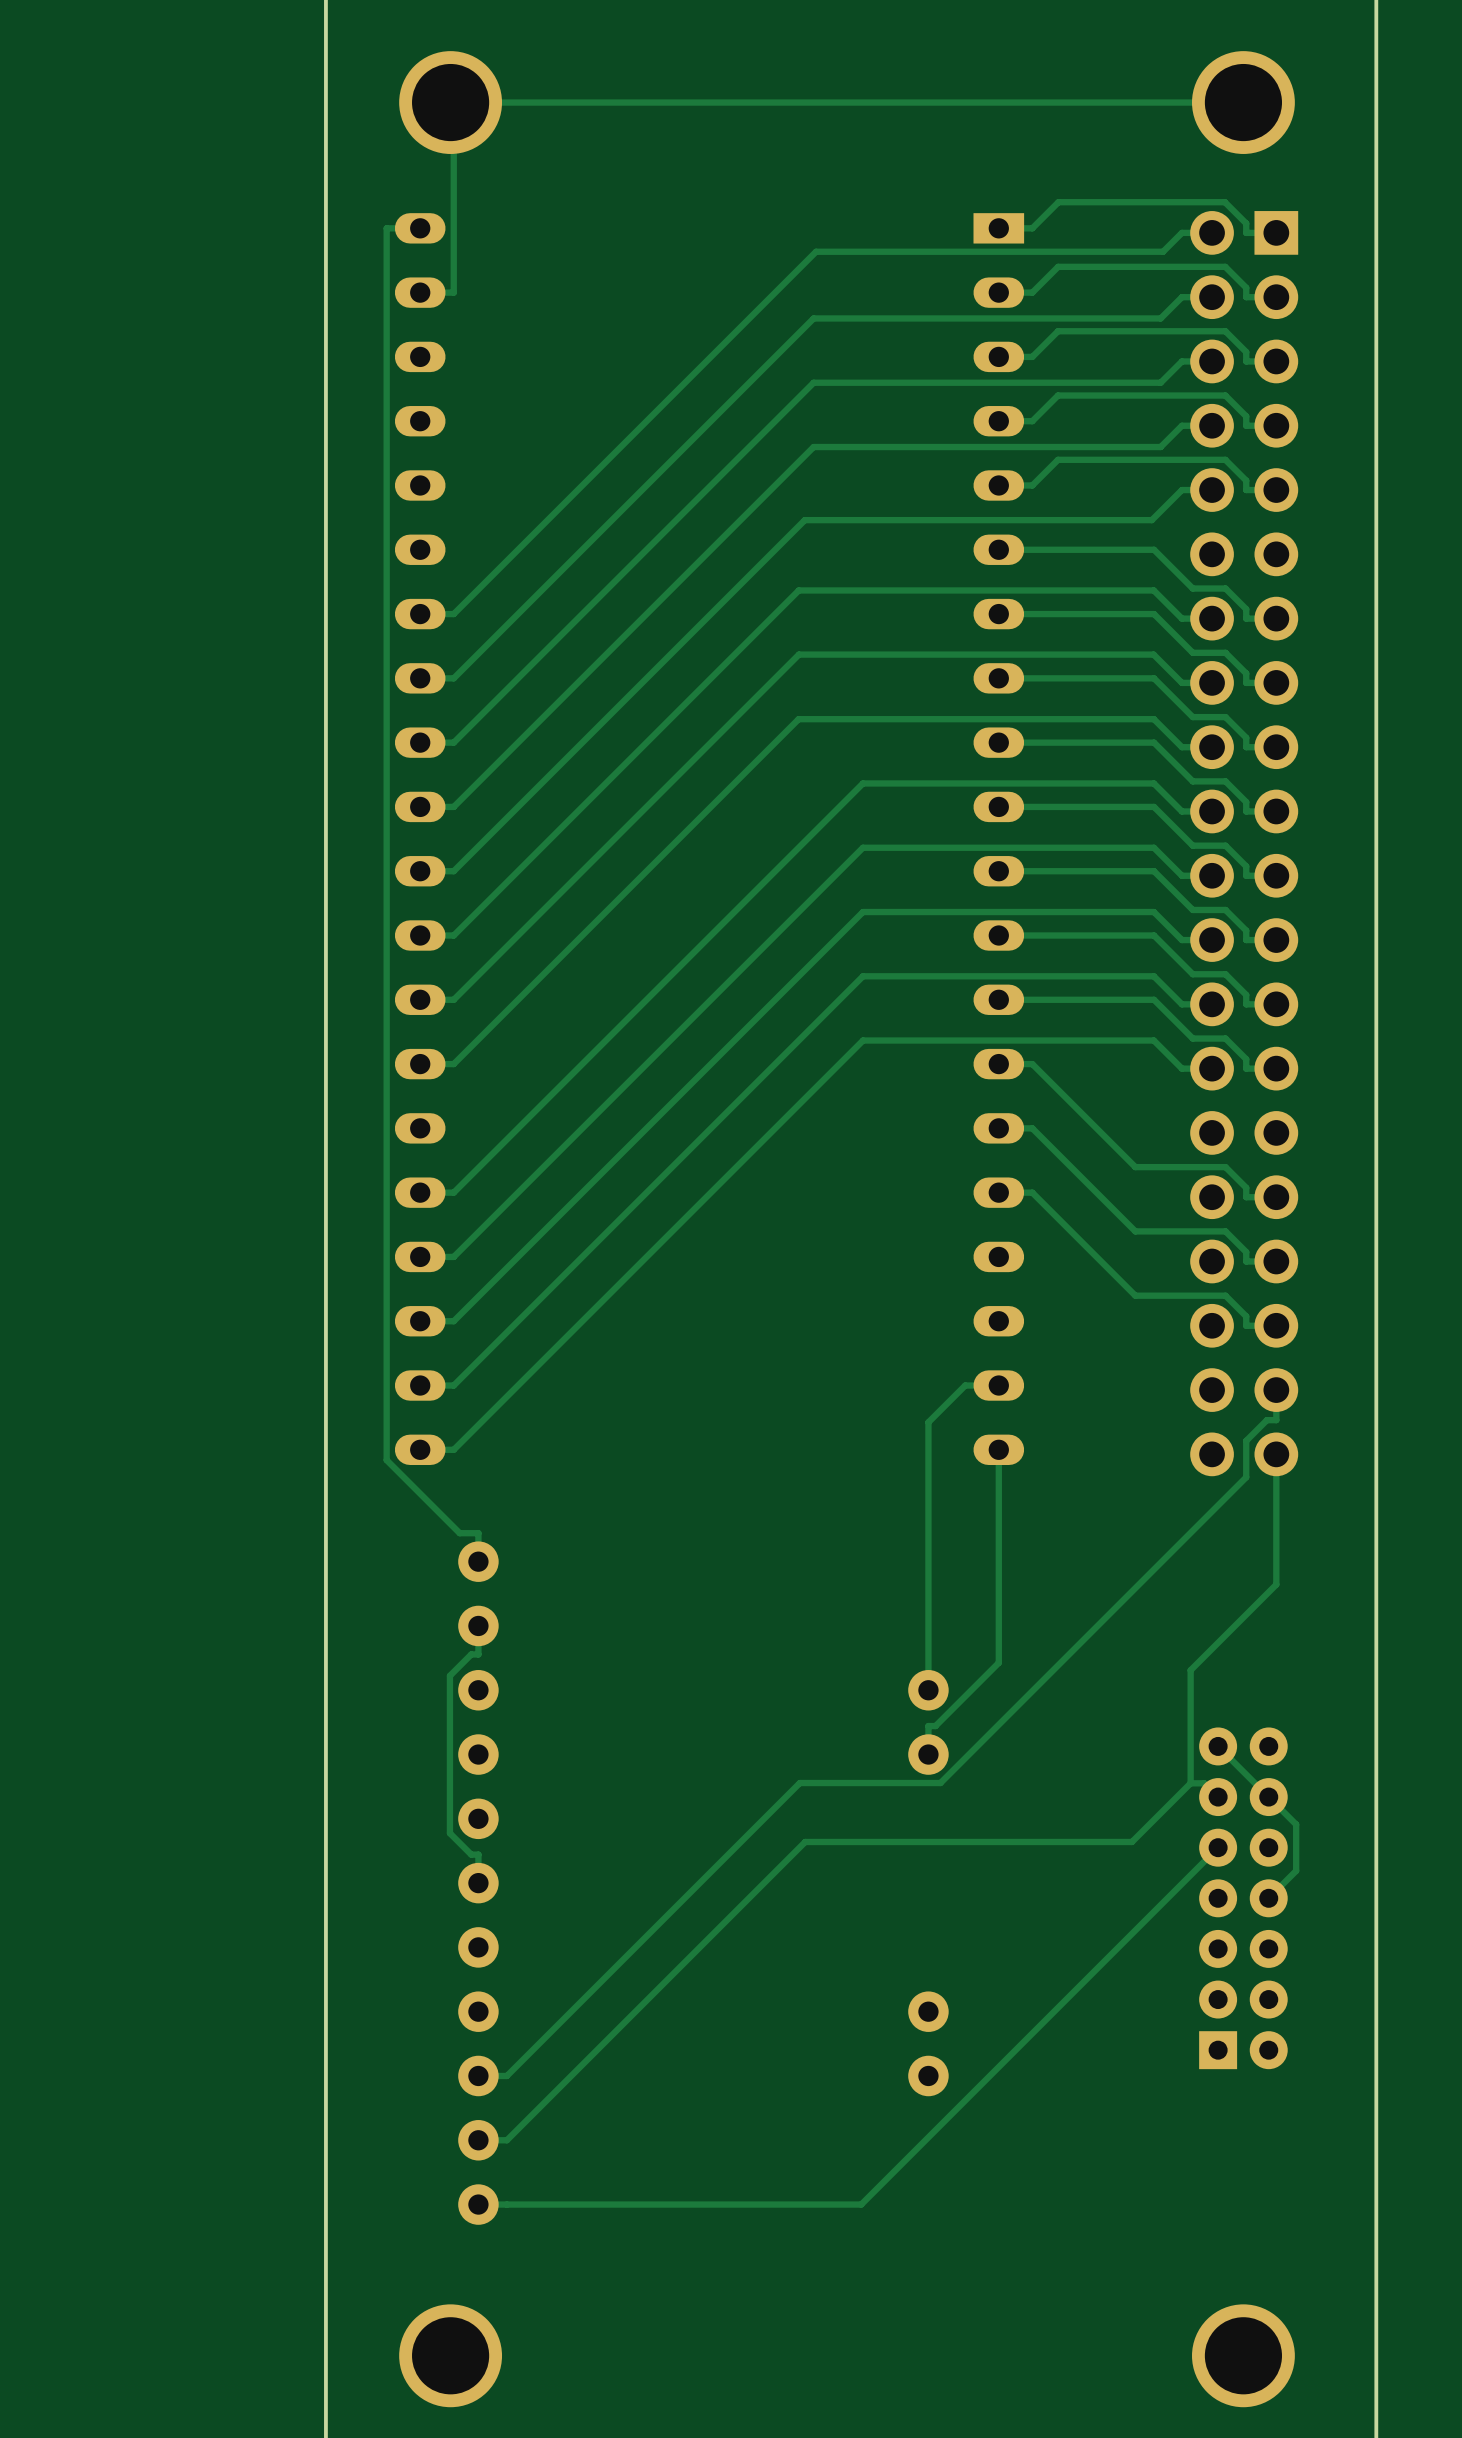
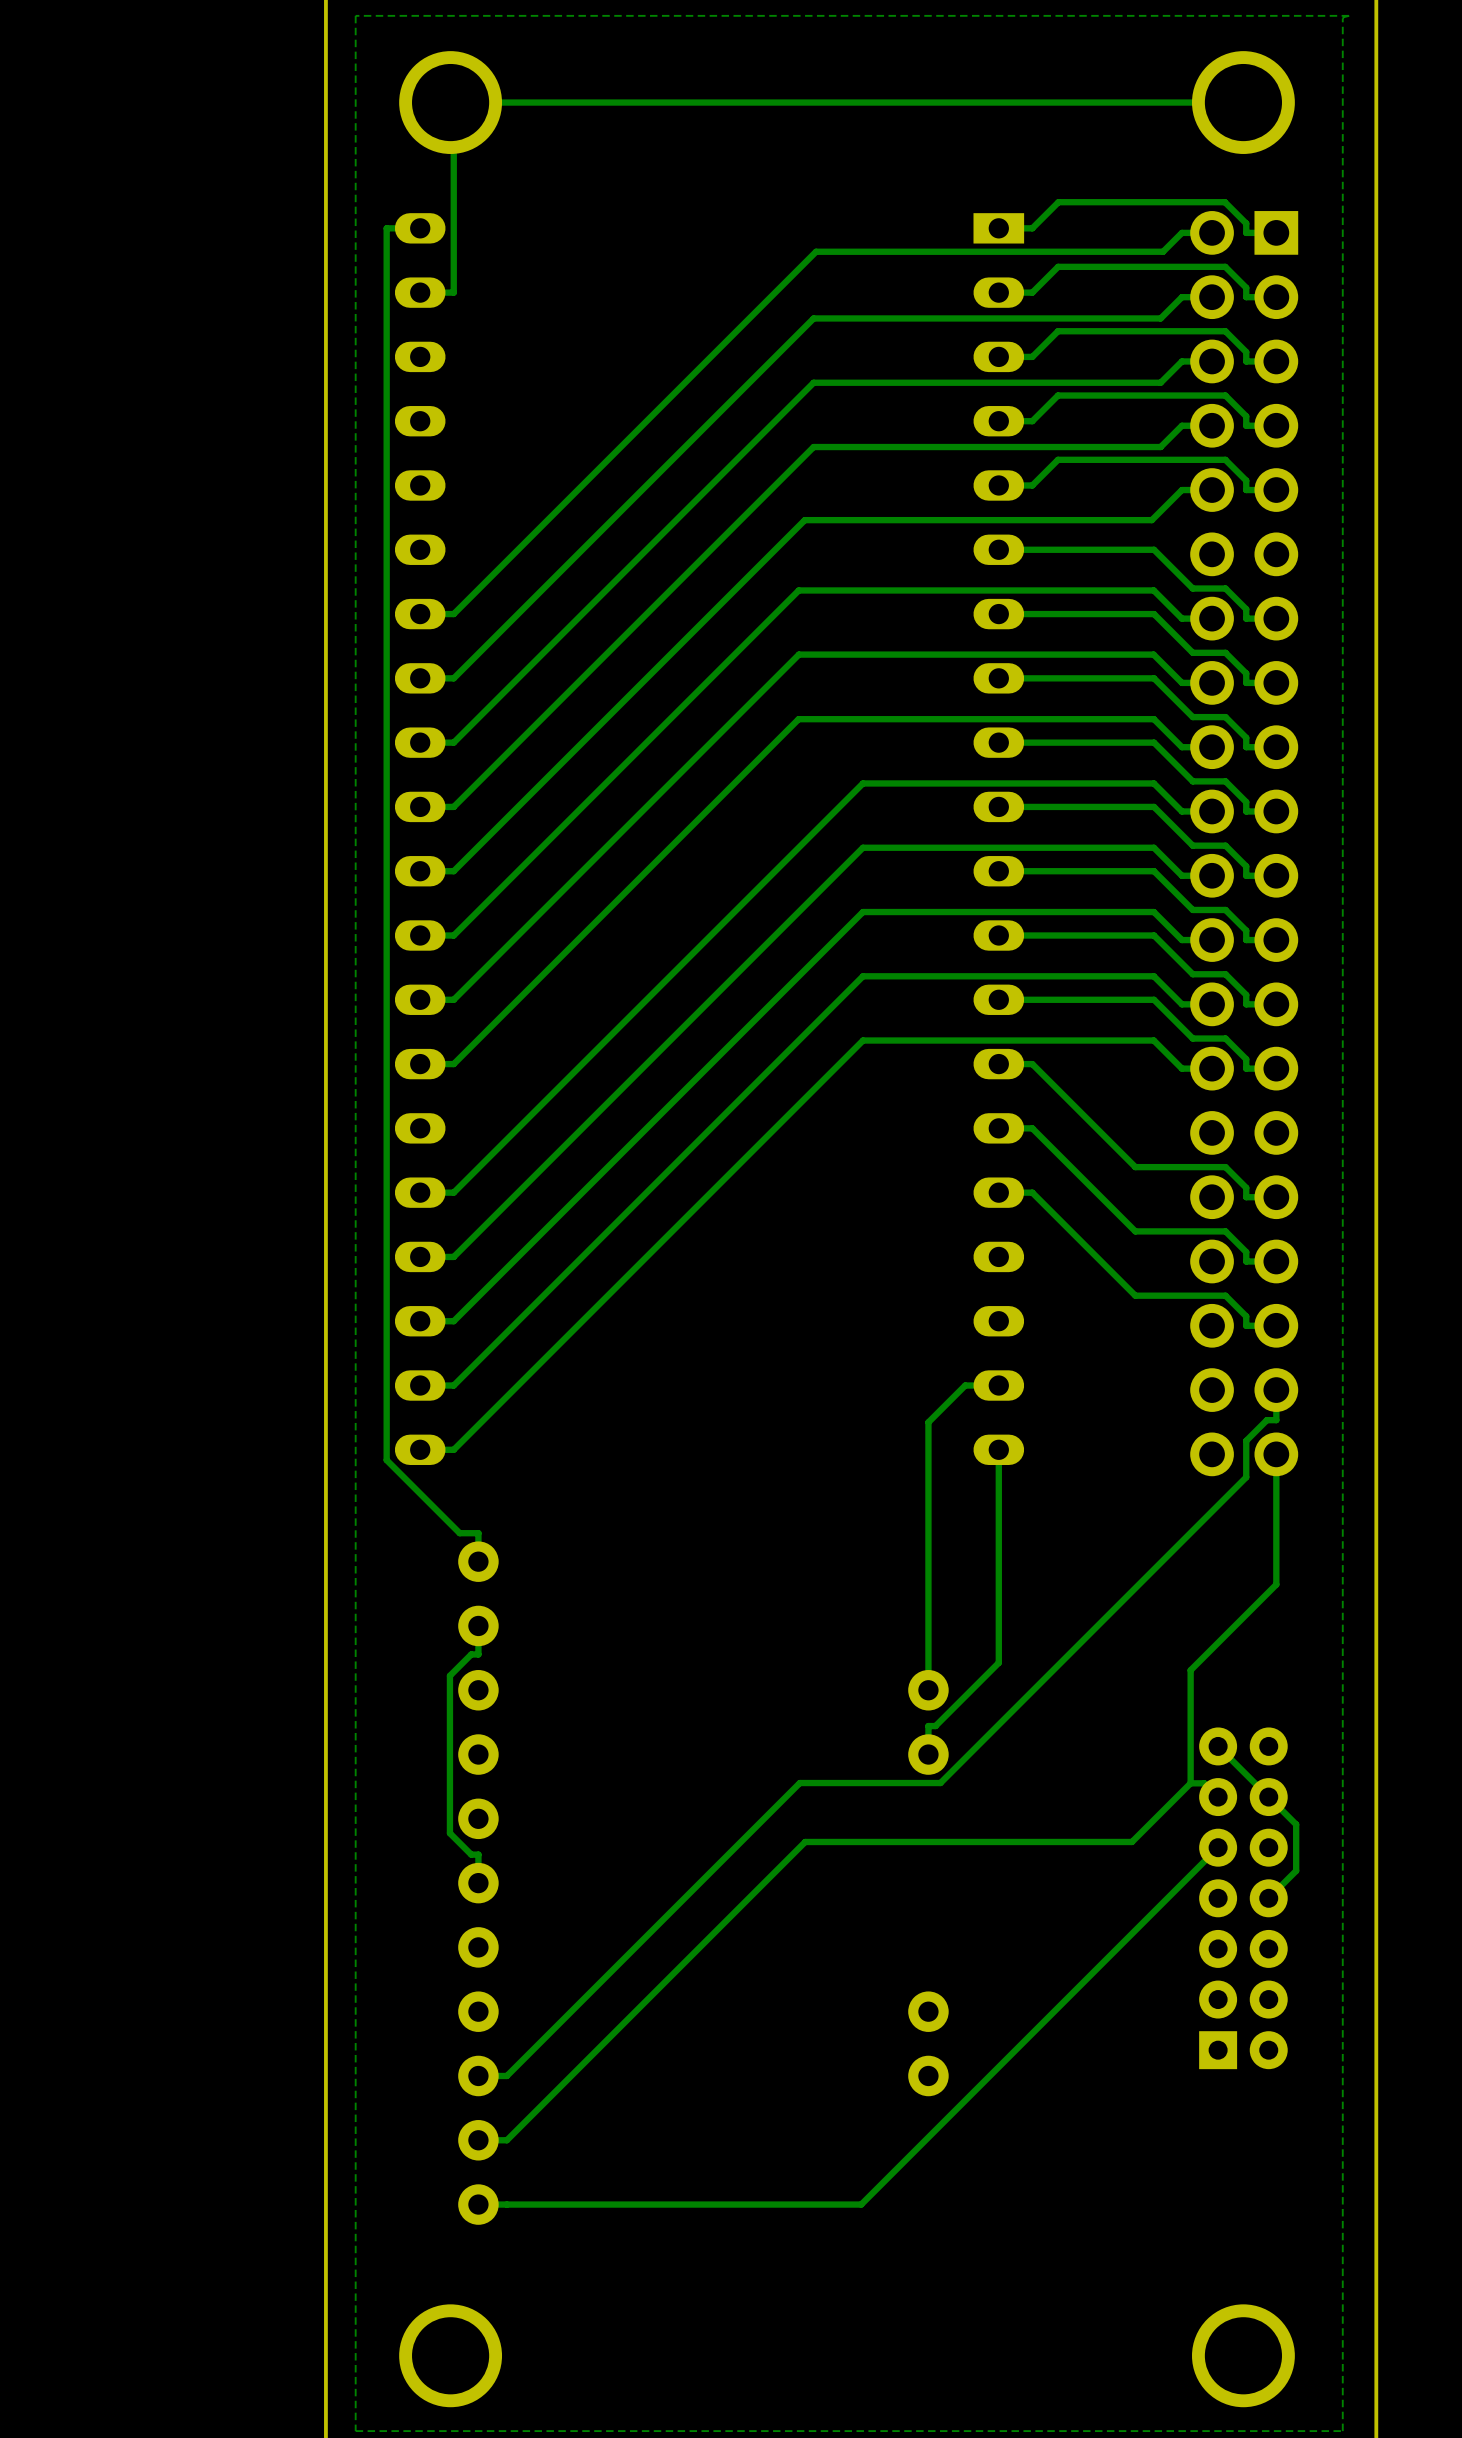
zone outline: none -> (1349, 15) (355, 15) (355, 2431) (1342, 2431) (1342, 18) (1349, 15)

